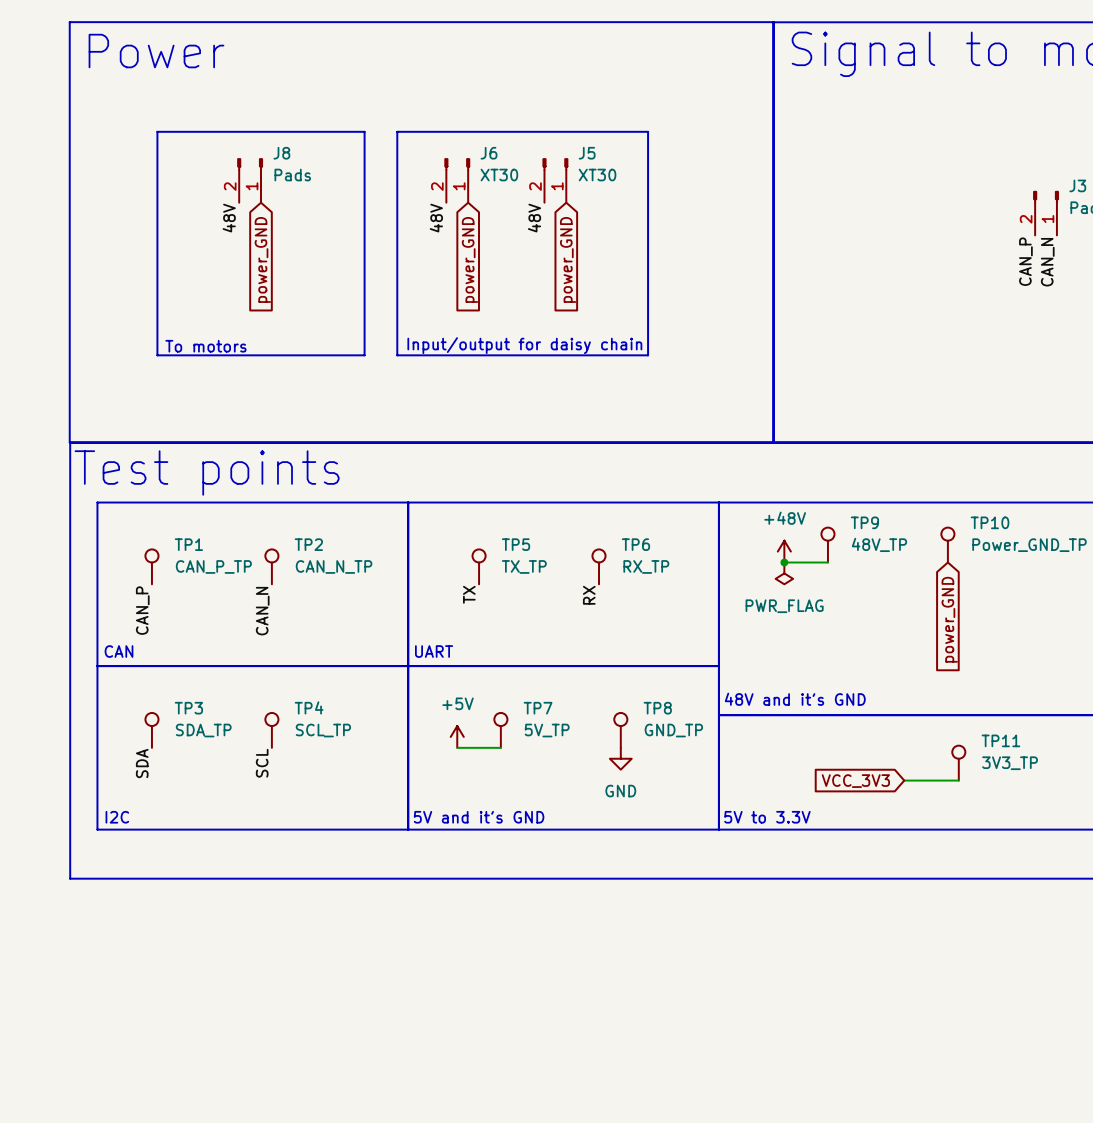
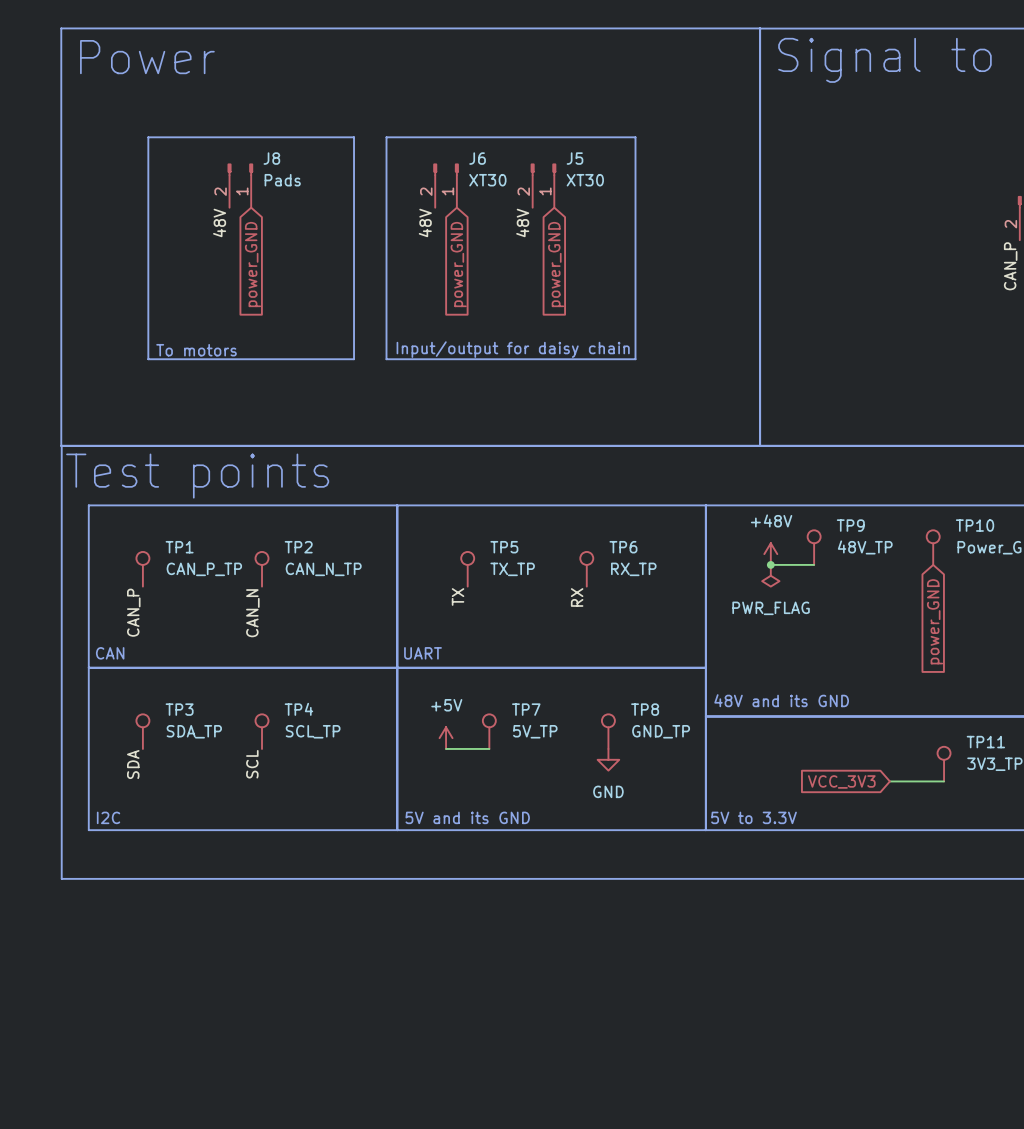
text: 48V and it's GND (795, 699) -> 48V and its GND (781, 700)
text: 5V and it's GND (479, 817) -> 5V and its GND (467, 817)

